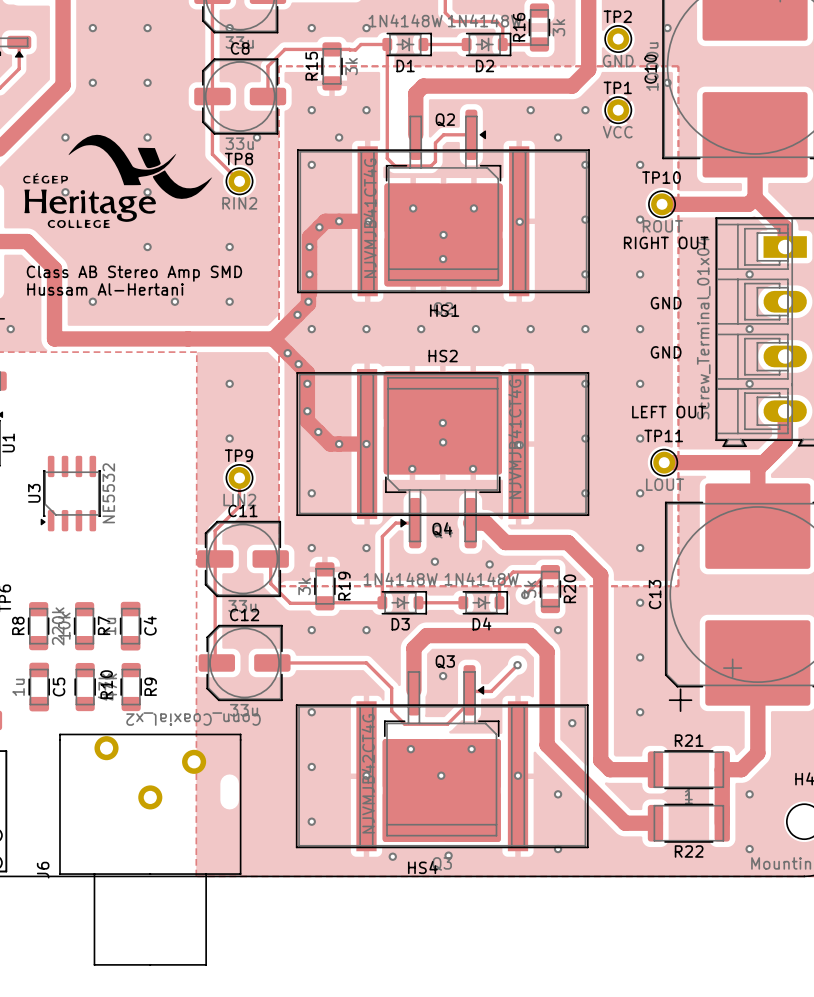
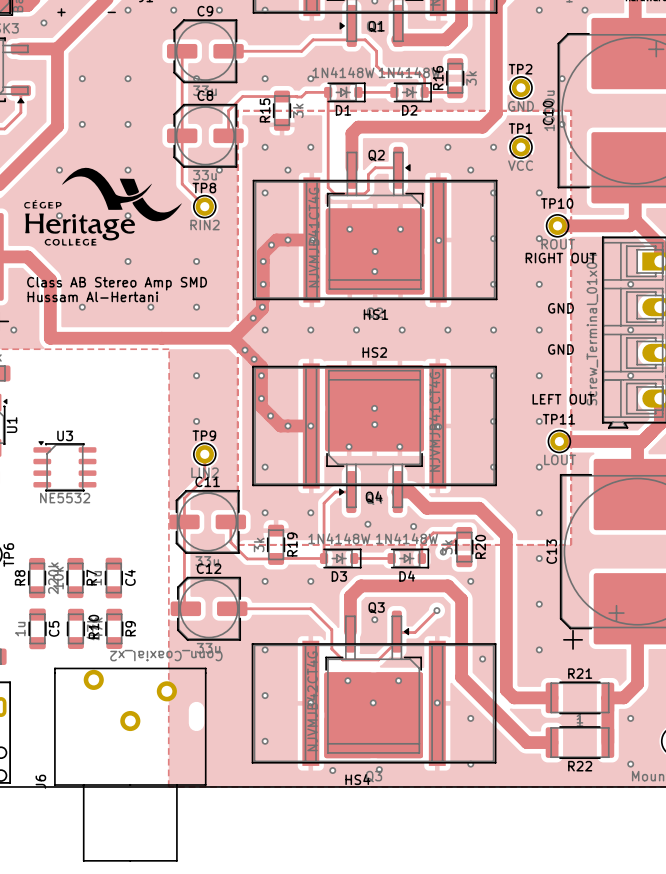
U3 rotation: 0° (70, 493) -> 90° clockwise (64, 466)

